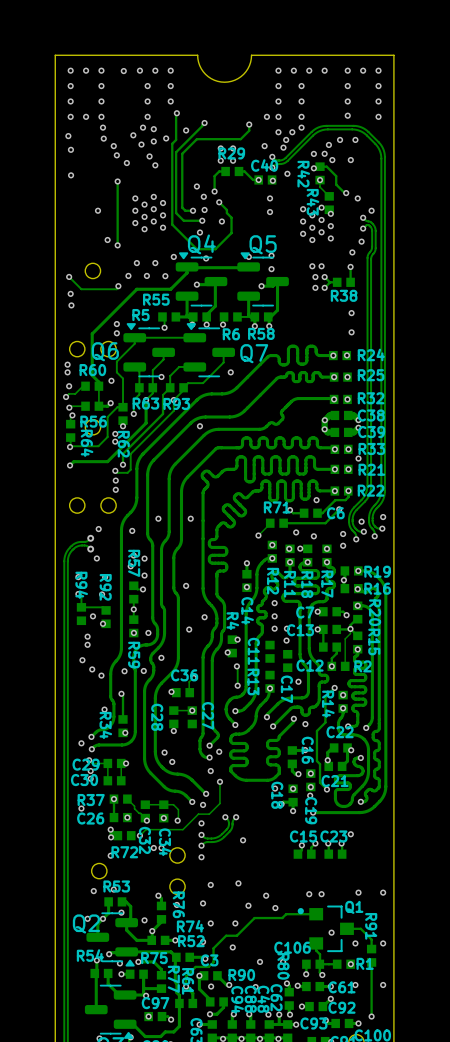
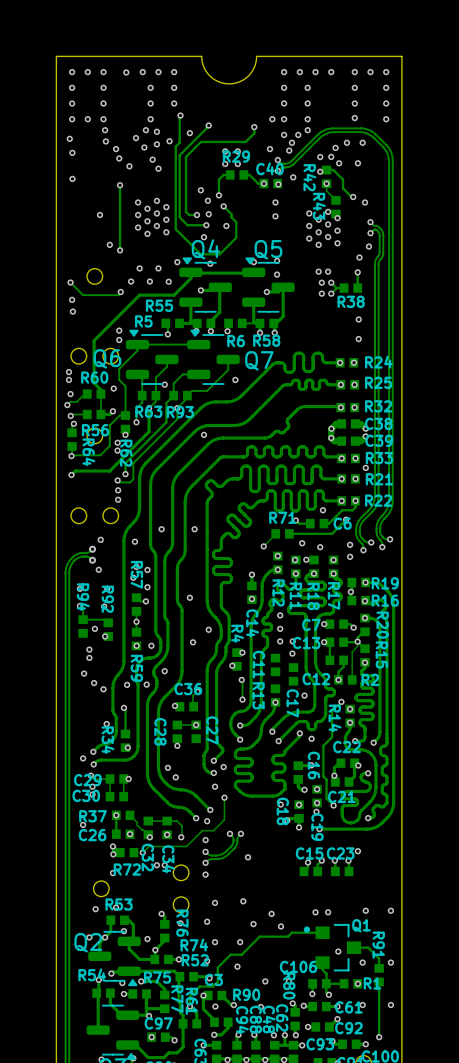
via: (371, 210) -> none
via: (383, 517) -> none
via: (361, 521) -> none

